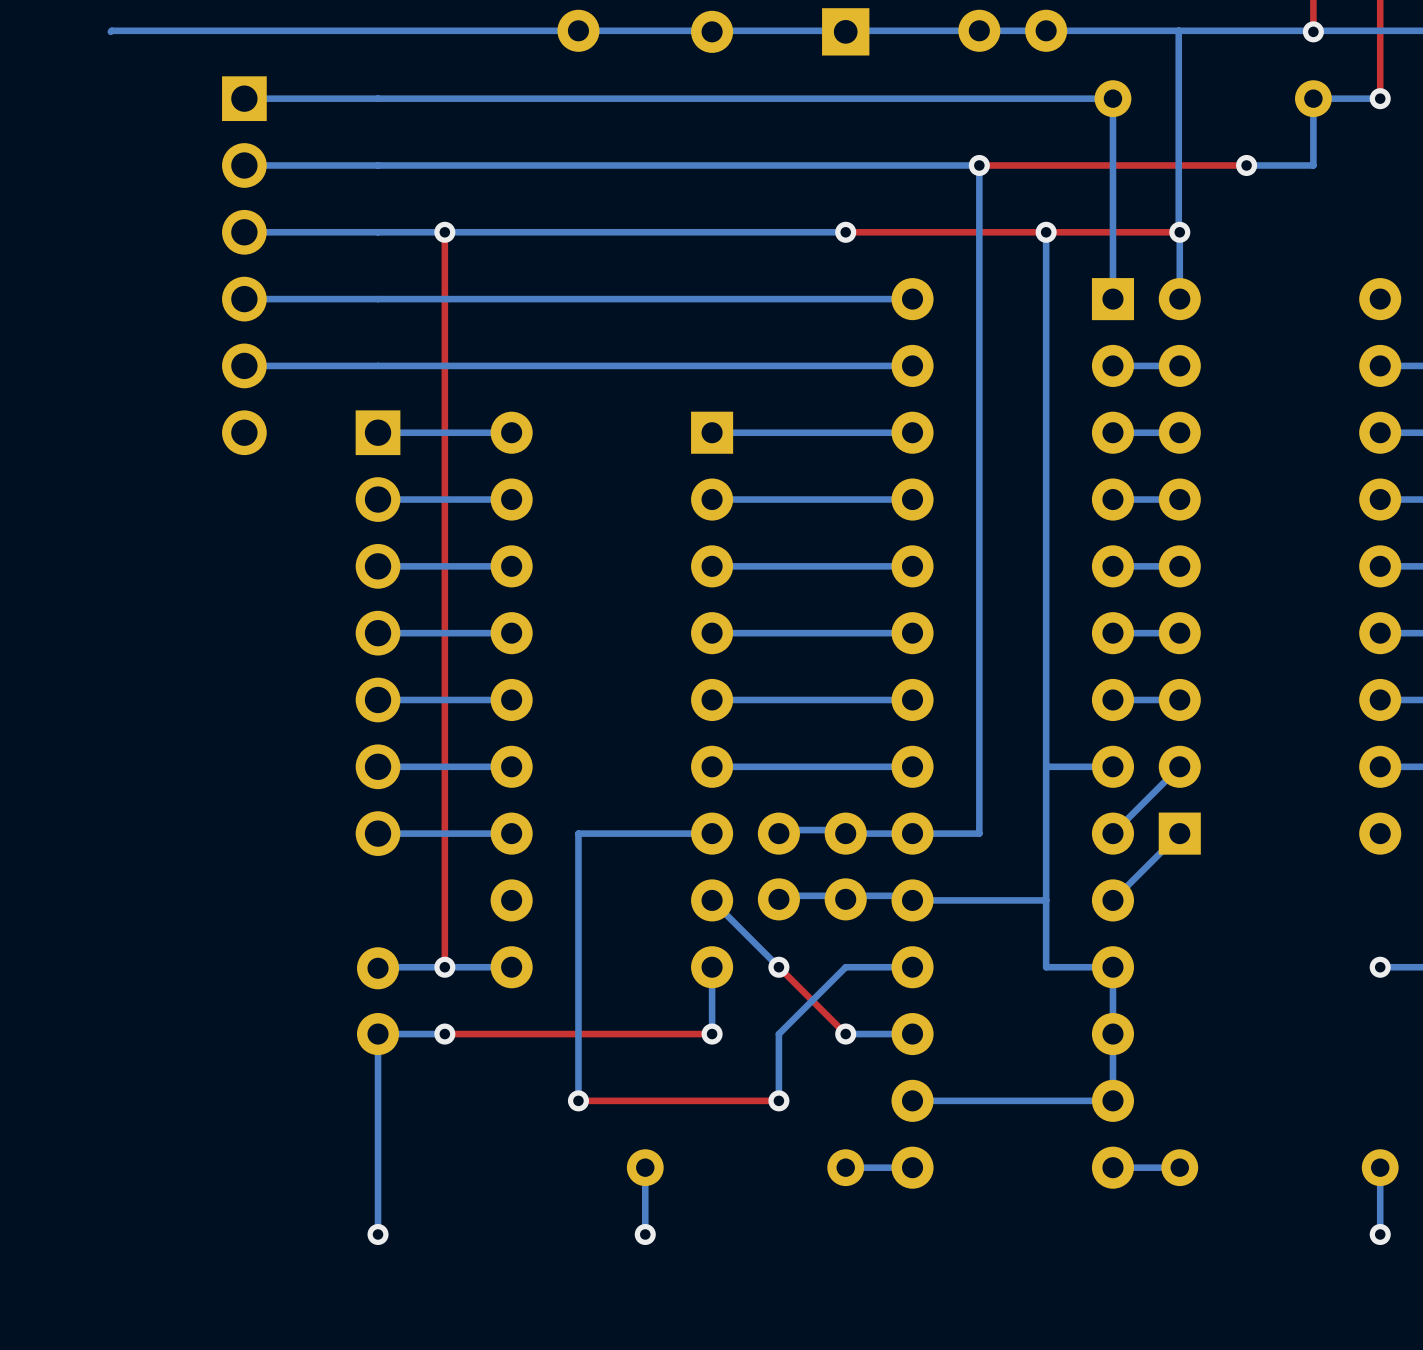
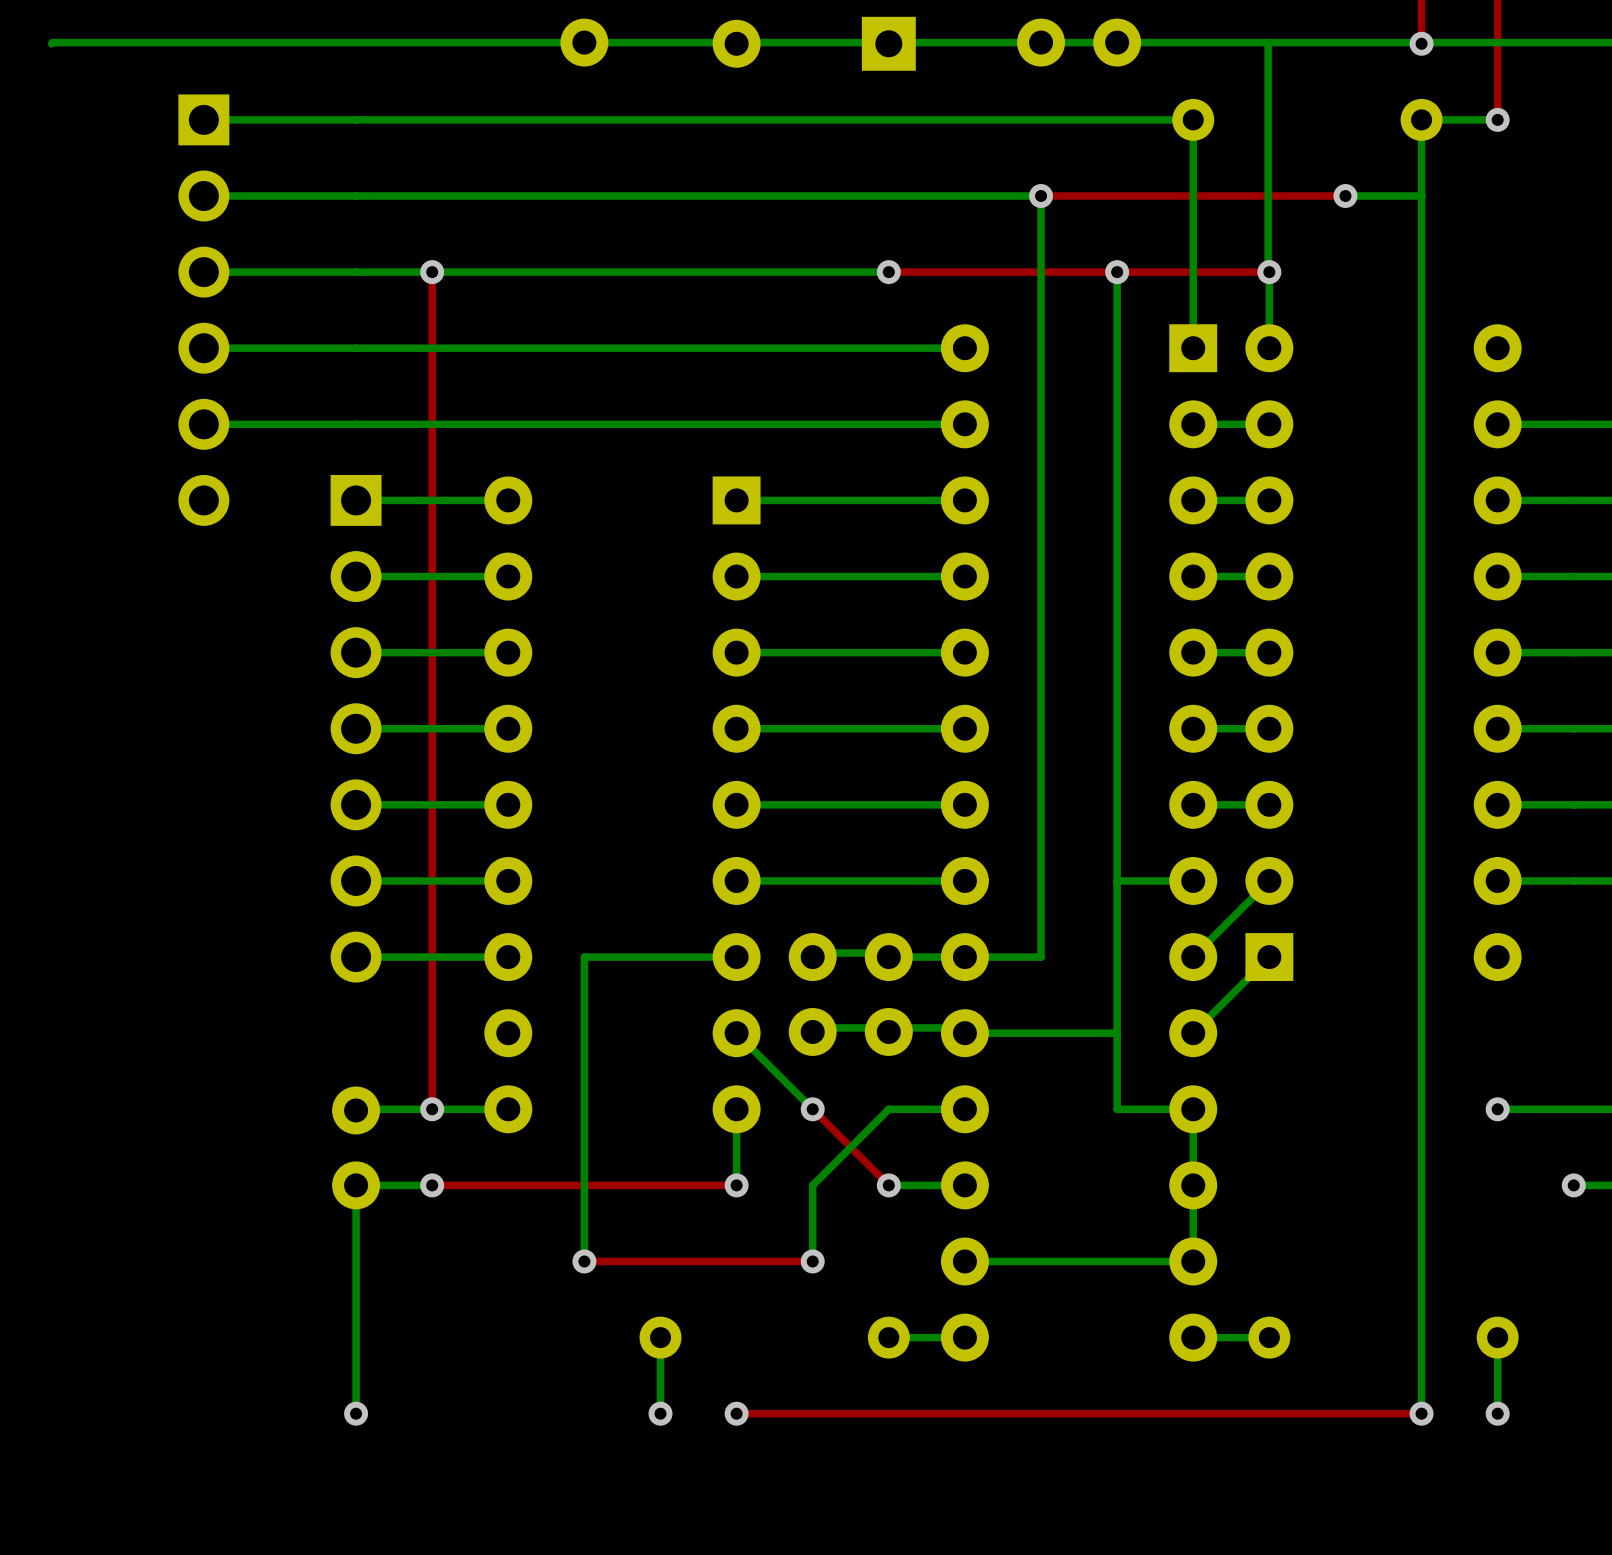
bottom track: none -> (1421, 196) (1421, 1413)
via: none -> (736, 1413)
top track: none -> (1421, 1413) (736, 1413)
via: none -> (1421, 1413)

